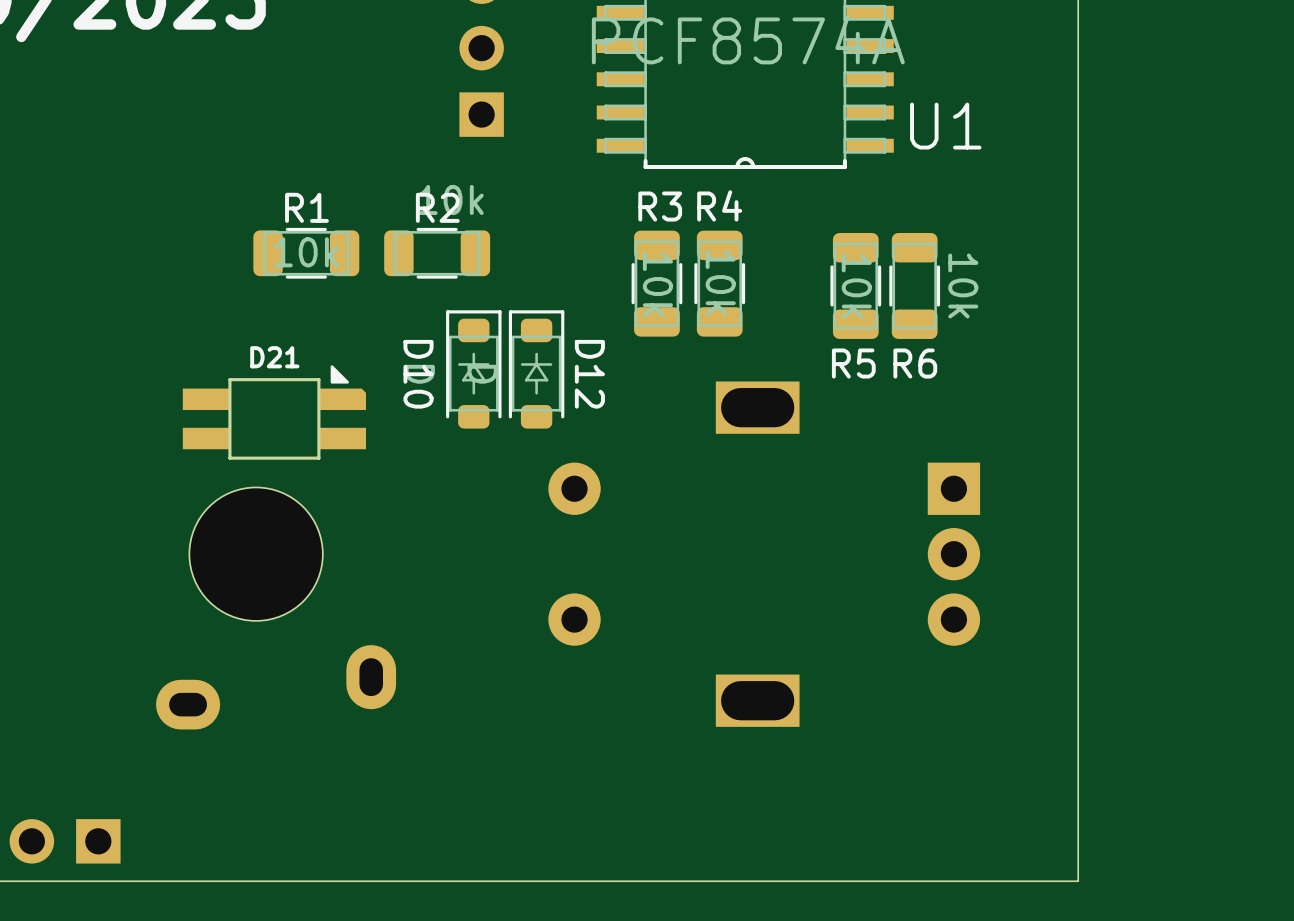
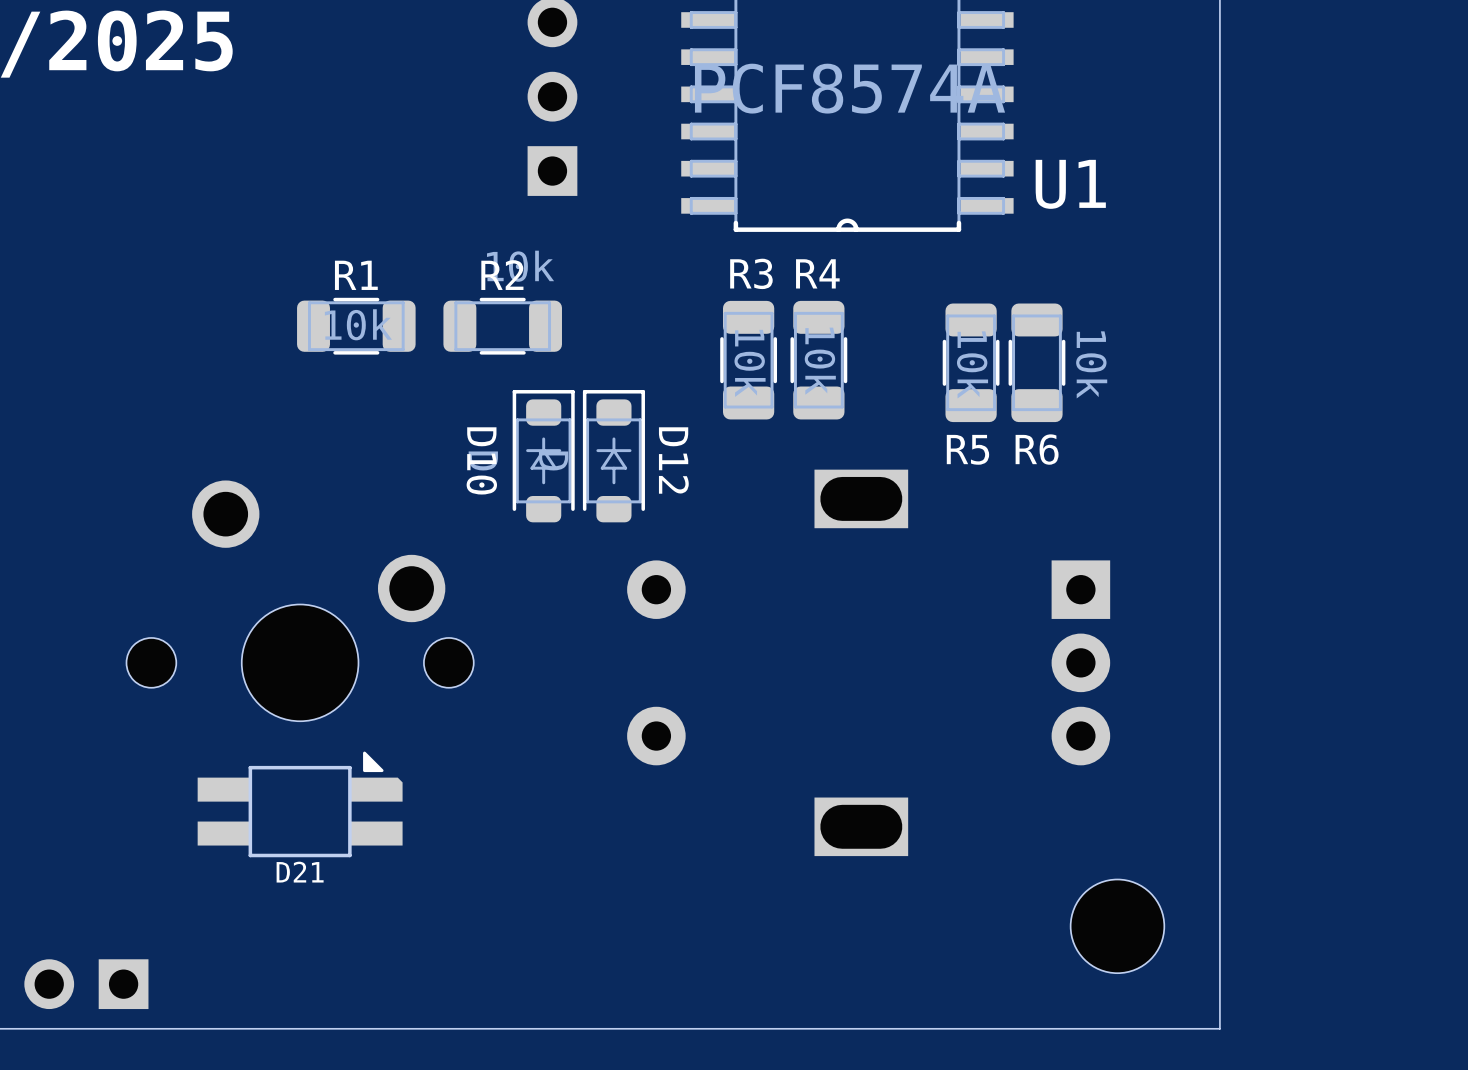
D21 name position: D21 (274, 357) -> D21 (300, 872)
D21 position: (274, 412) -> (300, 804)
part: none -> (300, 600)
part: (276, 608) -> none
part: none -> (1117, 926)

